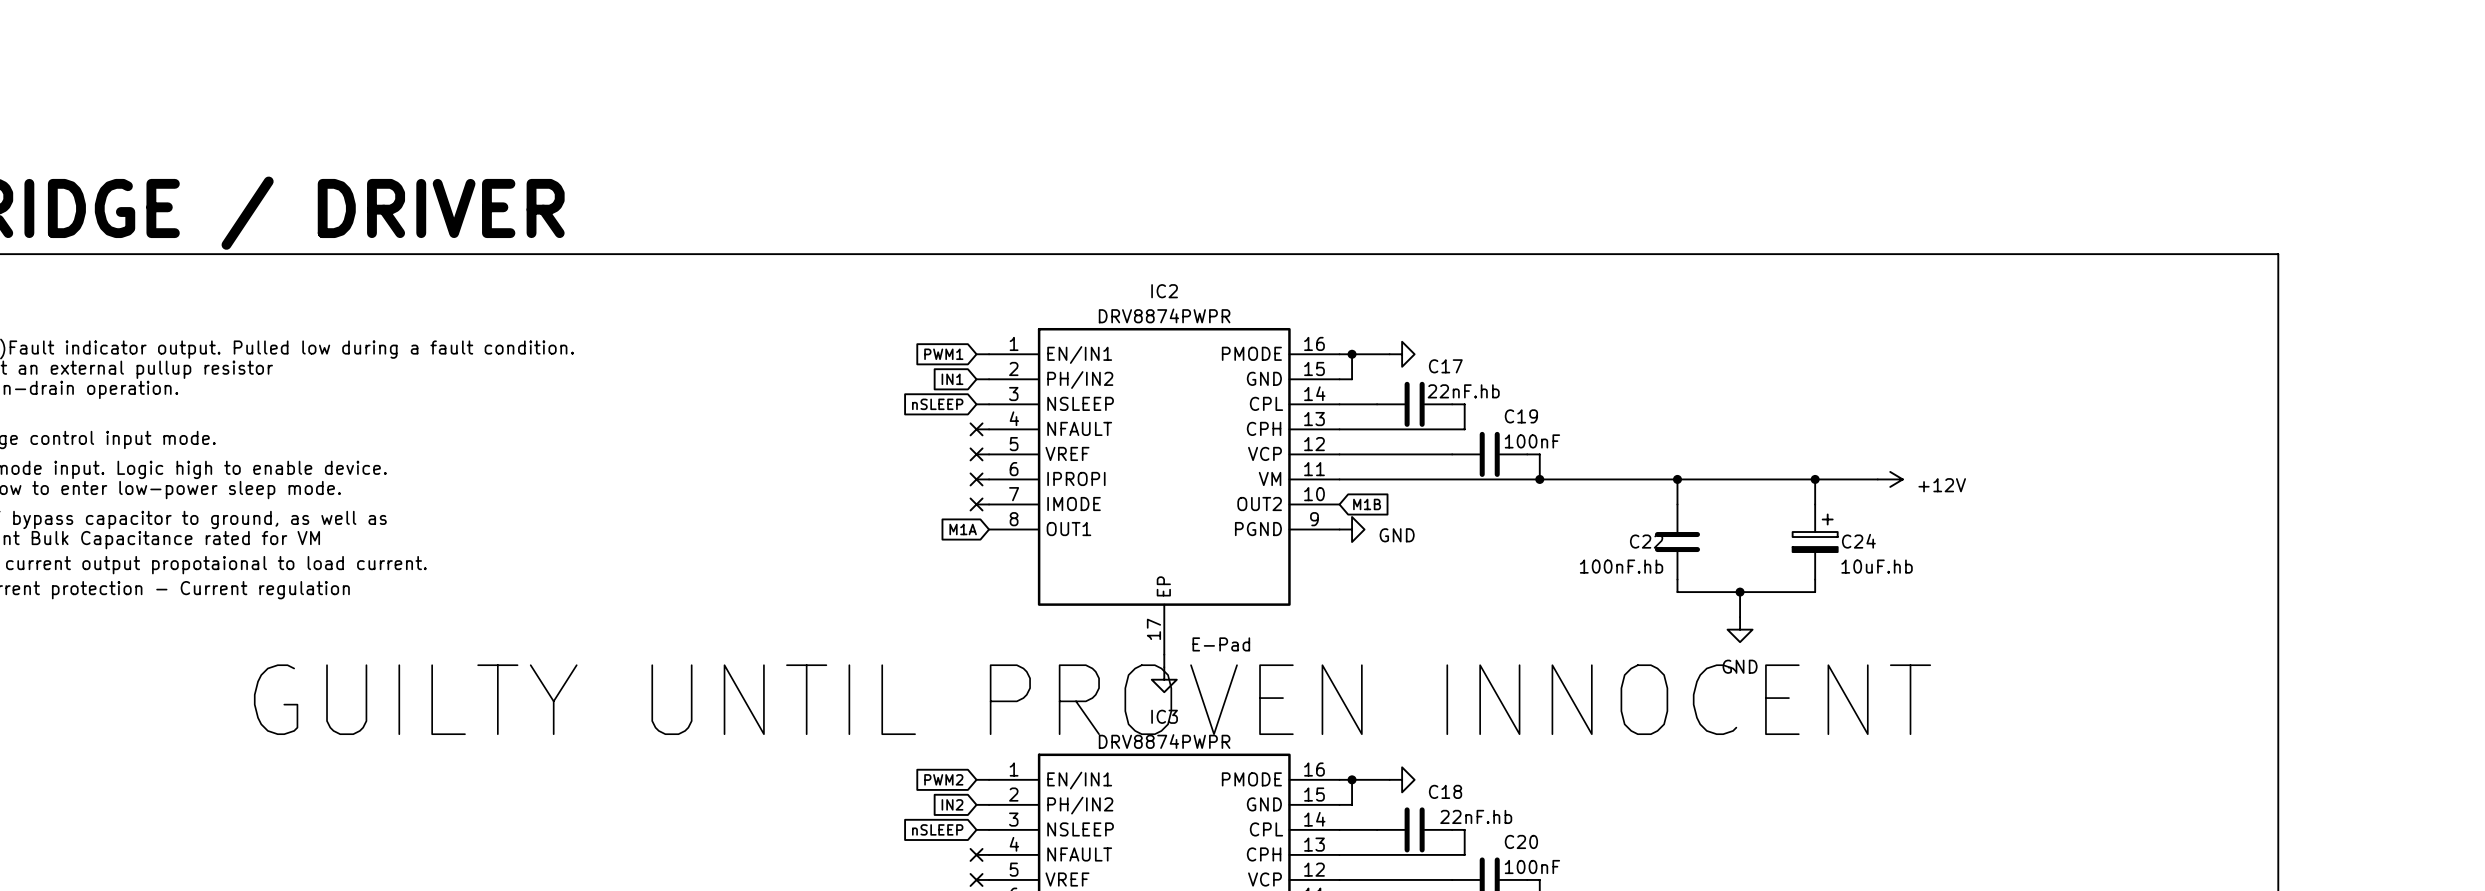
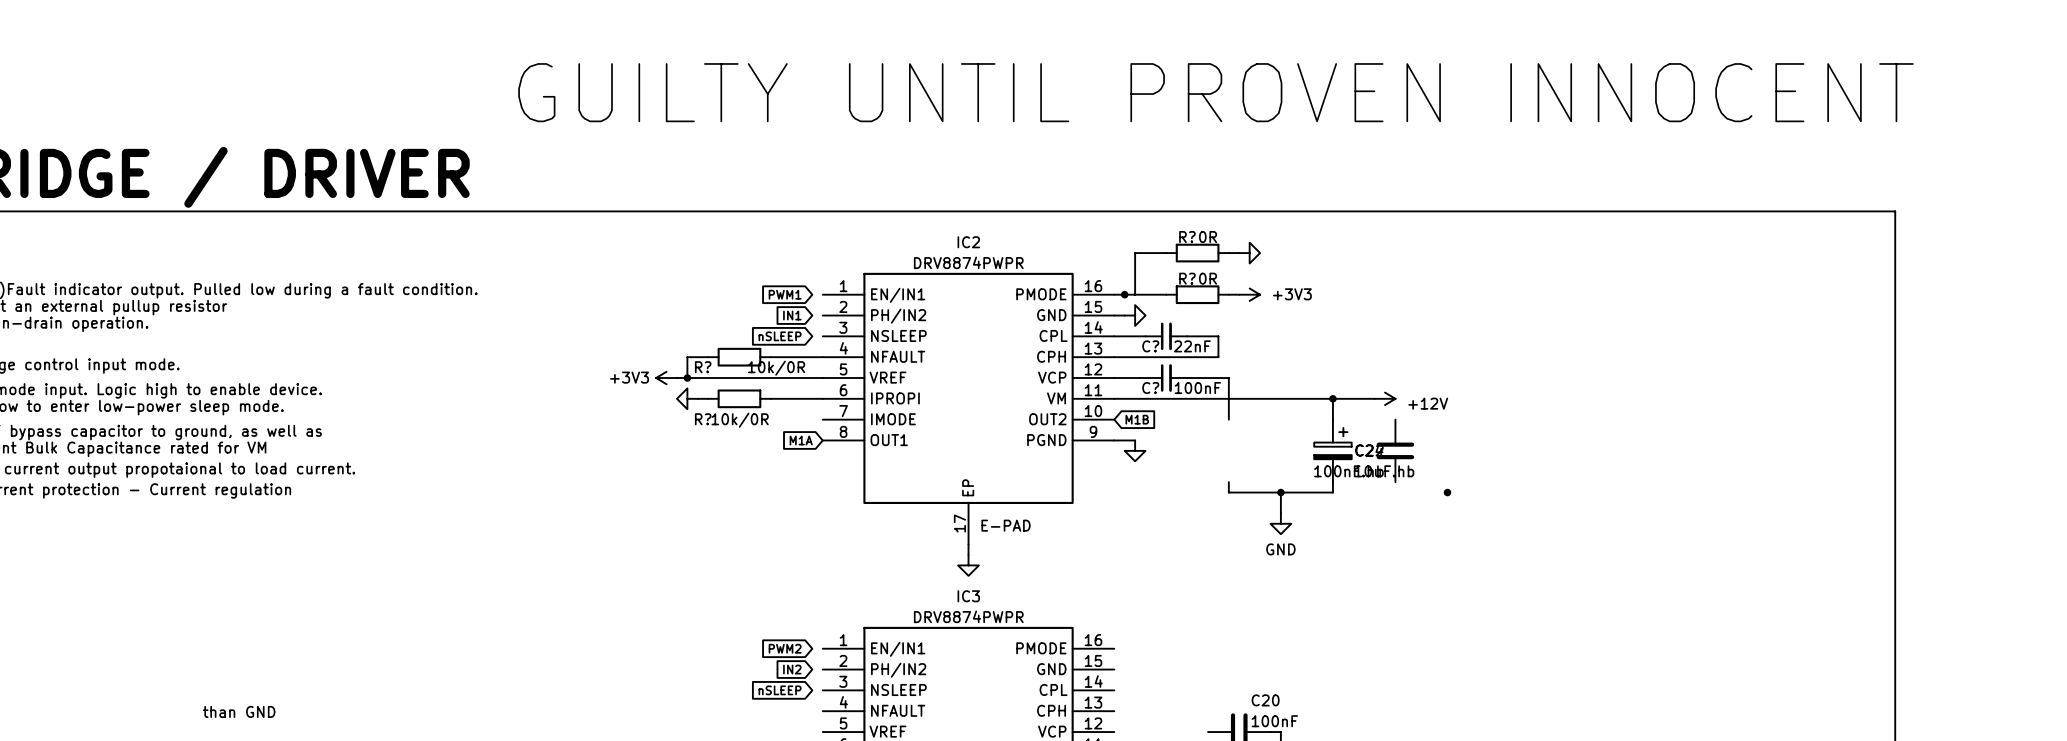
text: none -> GUILTY UNTIL PROVEN INNOCENT (1215, 92)
wire: none -> (1166, 253) (1135, 253) (1135, 294)
R?: none -> 0R (1197, 253)
wire: none -> (1228, 253) (1239, 253)
power symbol: none -> (1249, 253)
wire: (976, 354) (989, 354) -> none
wire: (1352, 354) (1352, 379) -> none
power symbol position: (1402, 354) -> (1135, 315)
R?: none -> 0R (1197, 294)
wire: none -> (1228, 294) (1239, 294)
power symbol: none -> +3V3 (1249, 294)
wire: (976, 379) (989, 379) -> none
wire: (976, 404) (989, 404) -> none
C?: none -> 22nF (1166, 336)
C17: 22nF.hb (1414, 404) -> none
wire: none -> (708, 357) (687, 357) (687, 378)
R?: none -> 10k/0R (739, 357)
wire: none -> (770, 357) (812, 357)
no-connect mark: (976, 429) -> none
power symbol: none -> +3V3 (666, 378)
wire: none -> (676, 378) (812, 378)
junction: none -> (687, 378)
no-connect mark: (976, 454) -> none
C?: none -> 100nF (1166, 378)
wire: none -> (1208, 378) (1228, 378) (1228, 419)
C19: 100nF (1489, 454) -> none
wire: (1527, 454) (1539, 454) (1539, 479) -> none
power symbol: none -> (687, 398)
R?: none -> 10k/0R (739, 398)
wire: none -> (770, 398) (812, 398)
no-connect mark: (976, 479) -> none
junction: (1539, 479) -> none
junction: none -> (1332, 398)
wire: (1652, 479) (1877, 479) -> none
wire: (1677, 479) (1677, 504) -> (1332, 398) (1332, 419)
junction: (1677, 479) -> none
wire: (1815, 479) (1815, 504) -> none
junction: (1815, 479) -> none
power symbol position: +12V (1890, 479) -> +12V (1385, 398)
wire: (976, 504) (989, 504) -> (697, 398) (708, 398)
no-connect mark: (976, 504) -> none
power symbol: GND (1352, 529) -> none
power symbol: none -> (1135, 450)
C24 position: (1815, 542) -> (1332, 450)
wire: none -> (1228, 482) (1228, 492) (1332, 492) (1332, 482)
wire: (1677, 579) (1677, 592) (1815, 592) (1815, 579) -> none
junction: none -> (1280, 492)
wire: (1740, 592) (1740, 617) -> (1280, 492) (1280, 513)
power symbol: none -> GND (1280, 523)
power symbol: GND (1740, 629) -> none
text: none -> E-PAD (1006, 525)
text: E-Pad (1221, 644) -> none
text: GUILTY UNTIL PROVEN INNOCENT (1092, 699) -> none
wire: (976, 779) (989, 779) -> none
wire: (1339, 779) (1389, 779) -> none
wire: (1352, 779) (1352, 804) (1339, 804) -> none
junction: (1352, 779) -> none
power symbol: (1402, 779) -> none
wire: (976, 804) (989, 804) -> none
wire: (976, 829) (989, 829) -> none
wire: (1339, 829) (1377, 829) -> none
C18: 22nF.hb (1414, 829) -> none
wire: (1452, 829) (1464, 829) (1464, 854) (1339, 854) -> none
wire: (976, 854) (989, 854) -> none
no-connect mark: (976, 854) -> none
text: none -> than GND (239, 711)
wire: (976, 879) (989, 879) -> none
no-connect mark: (976, 879) -> none
wire: (1339, 879) (1452, 879) -> none

